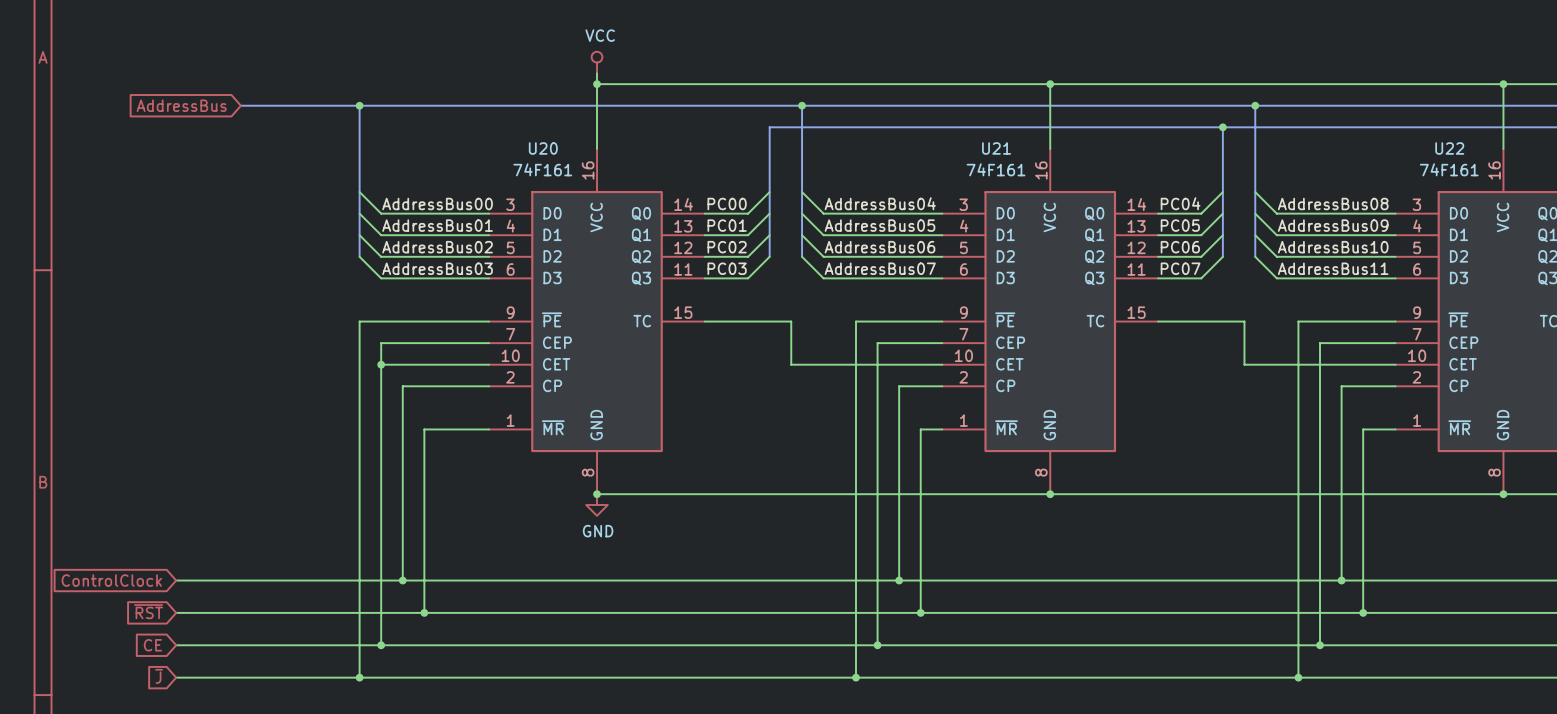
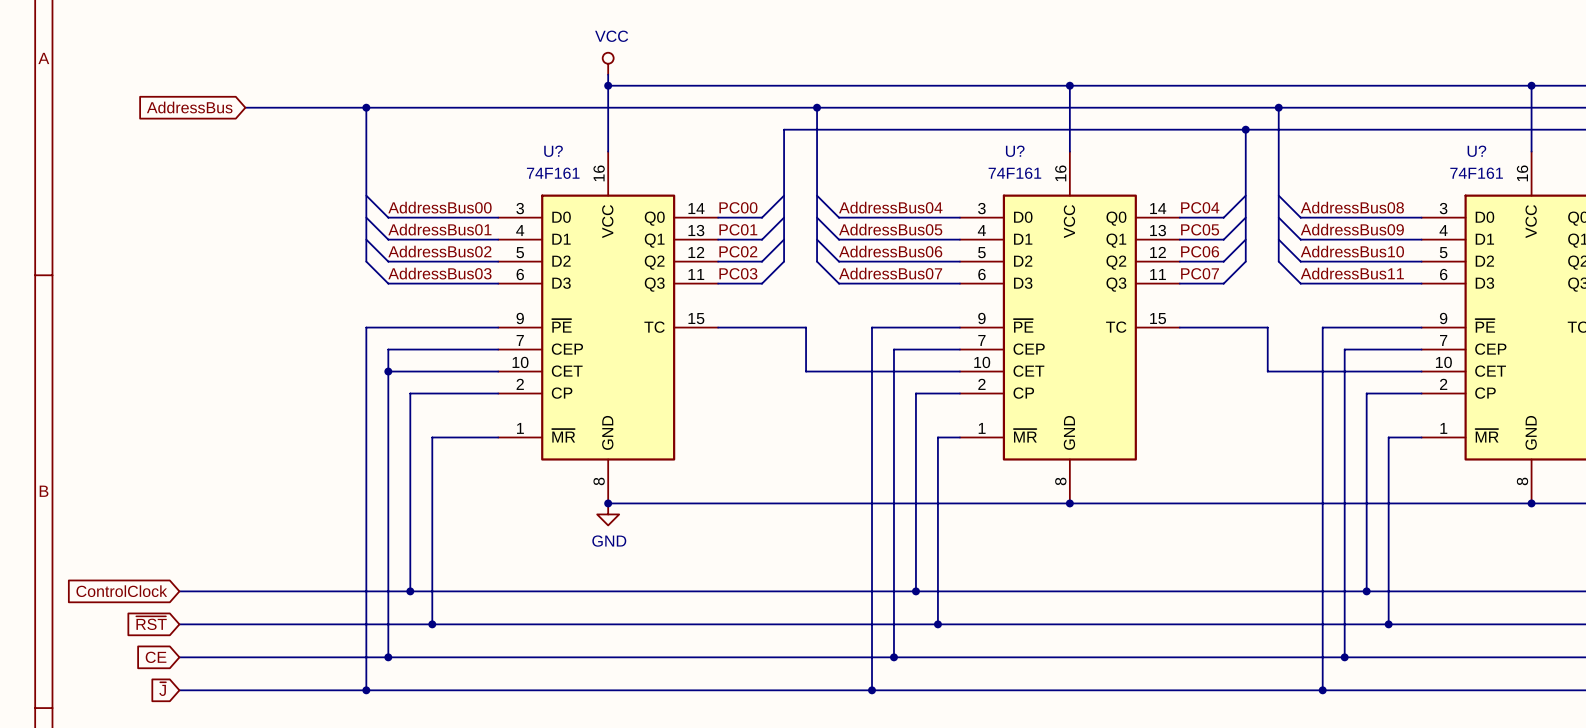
U20 name: U20 (543, 148) -> U? (553, 151)
U21 name: U21 (996, 148) -> U? (1015, 151)
U22 name: U22 (1449, 148) -> U? (1476, 151)

